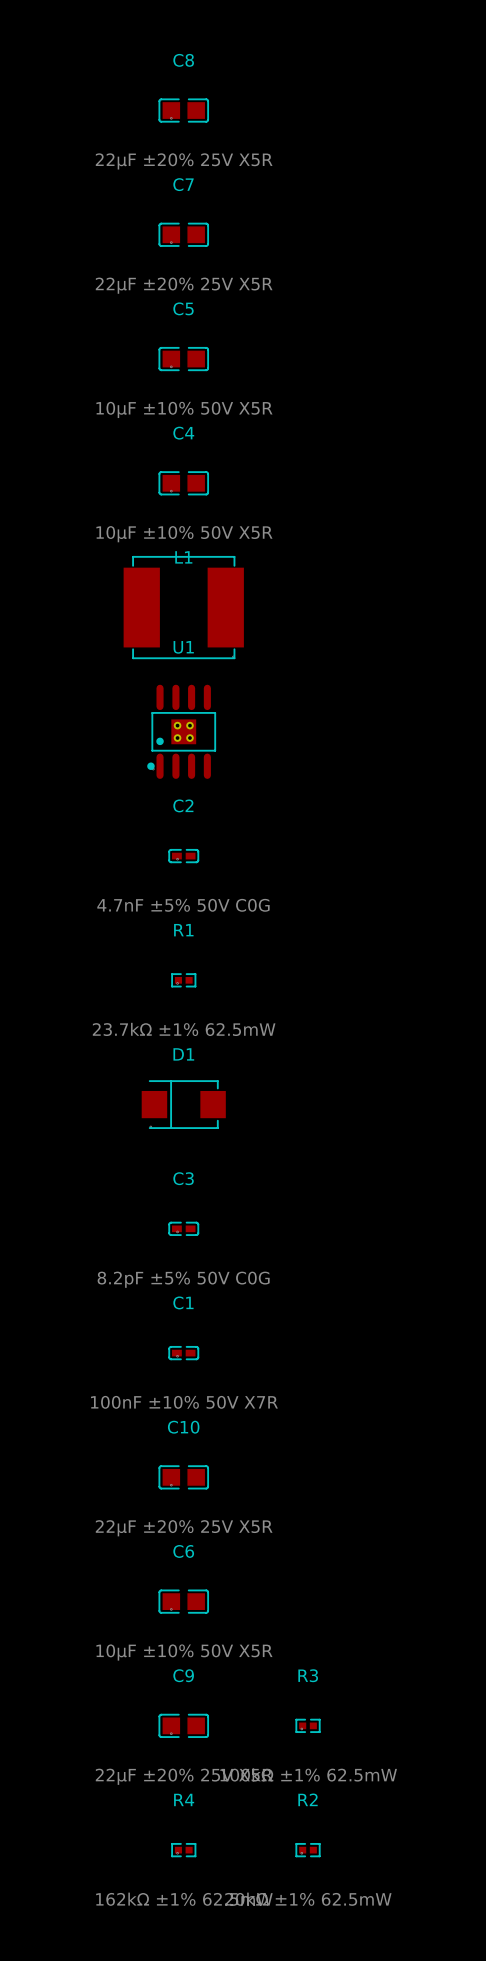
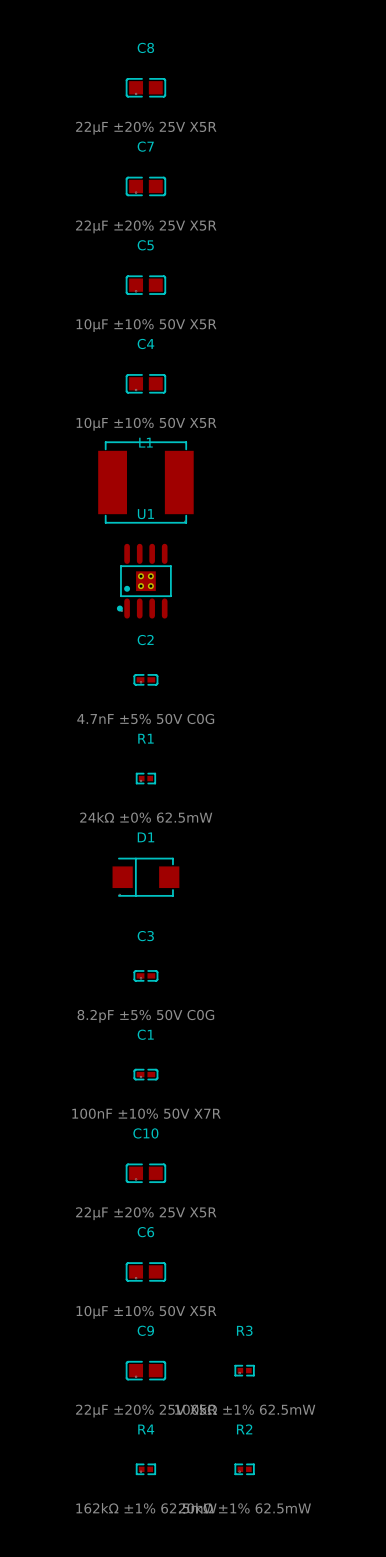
R1 value: 23.7kΩ ±1% 62.5mW (184, 1029) -> 24kΩ ±0% 62.5mW (146, 817)

